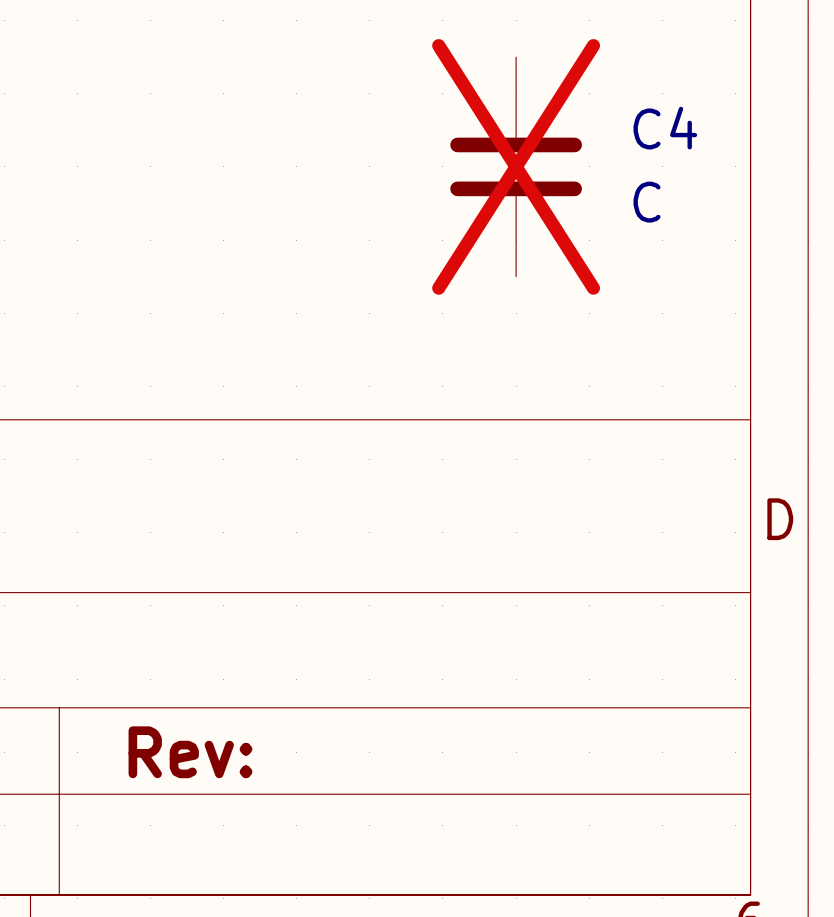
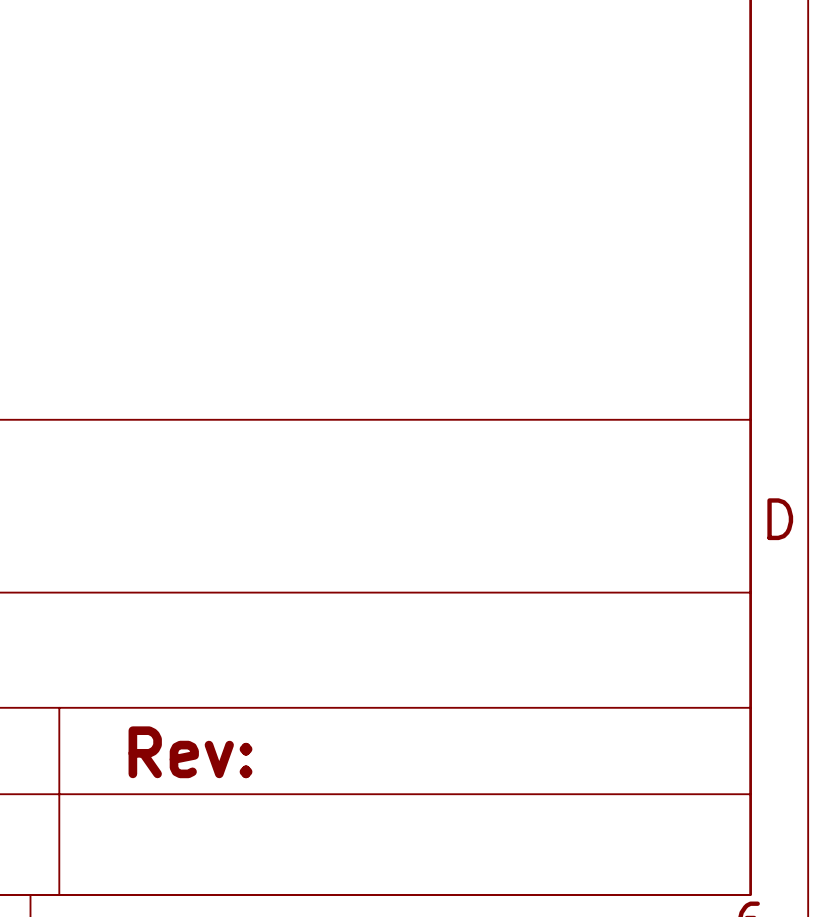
C4: C (516, 166) -> none

